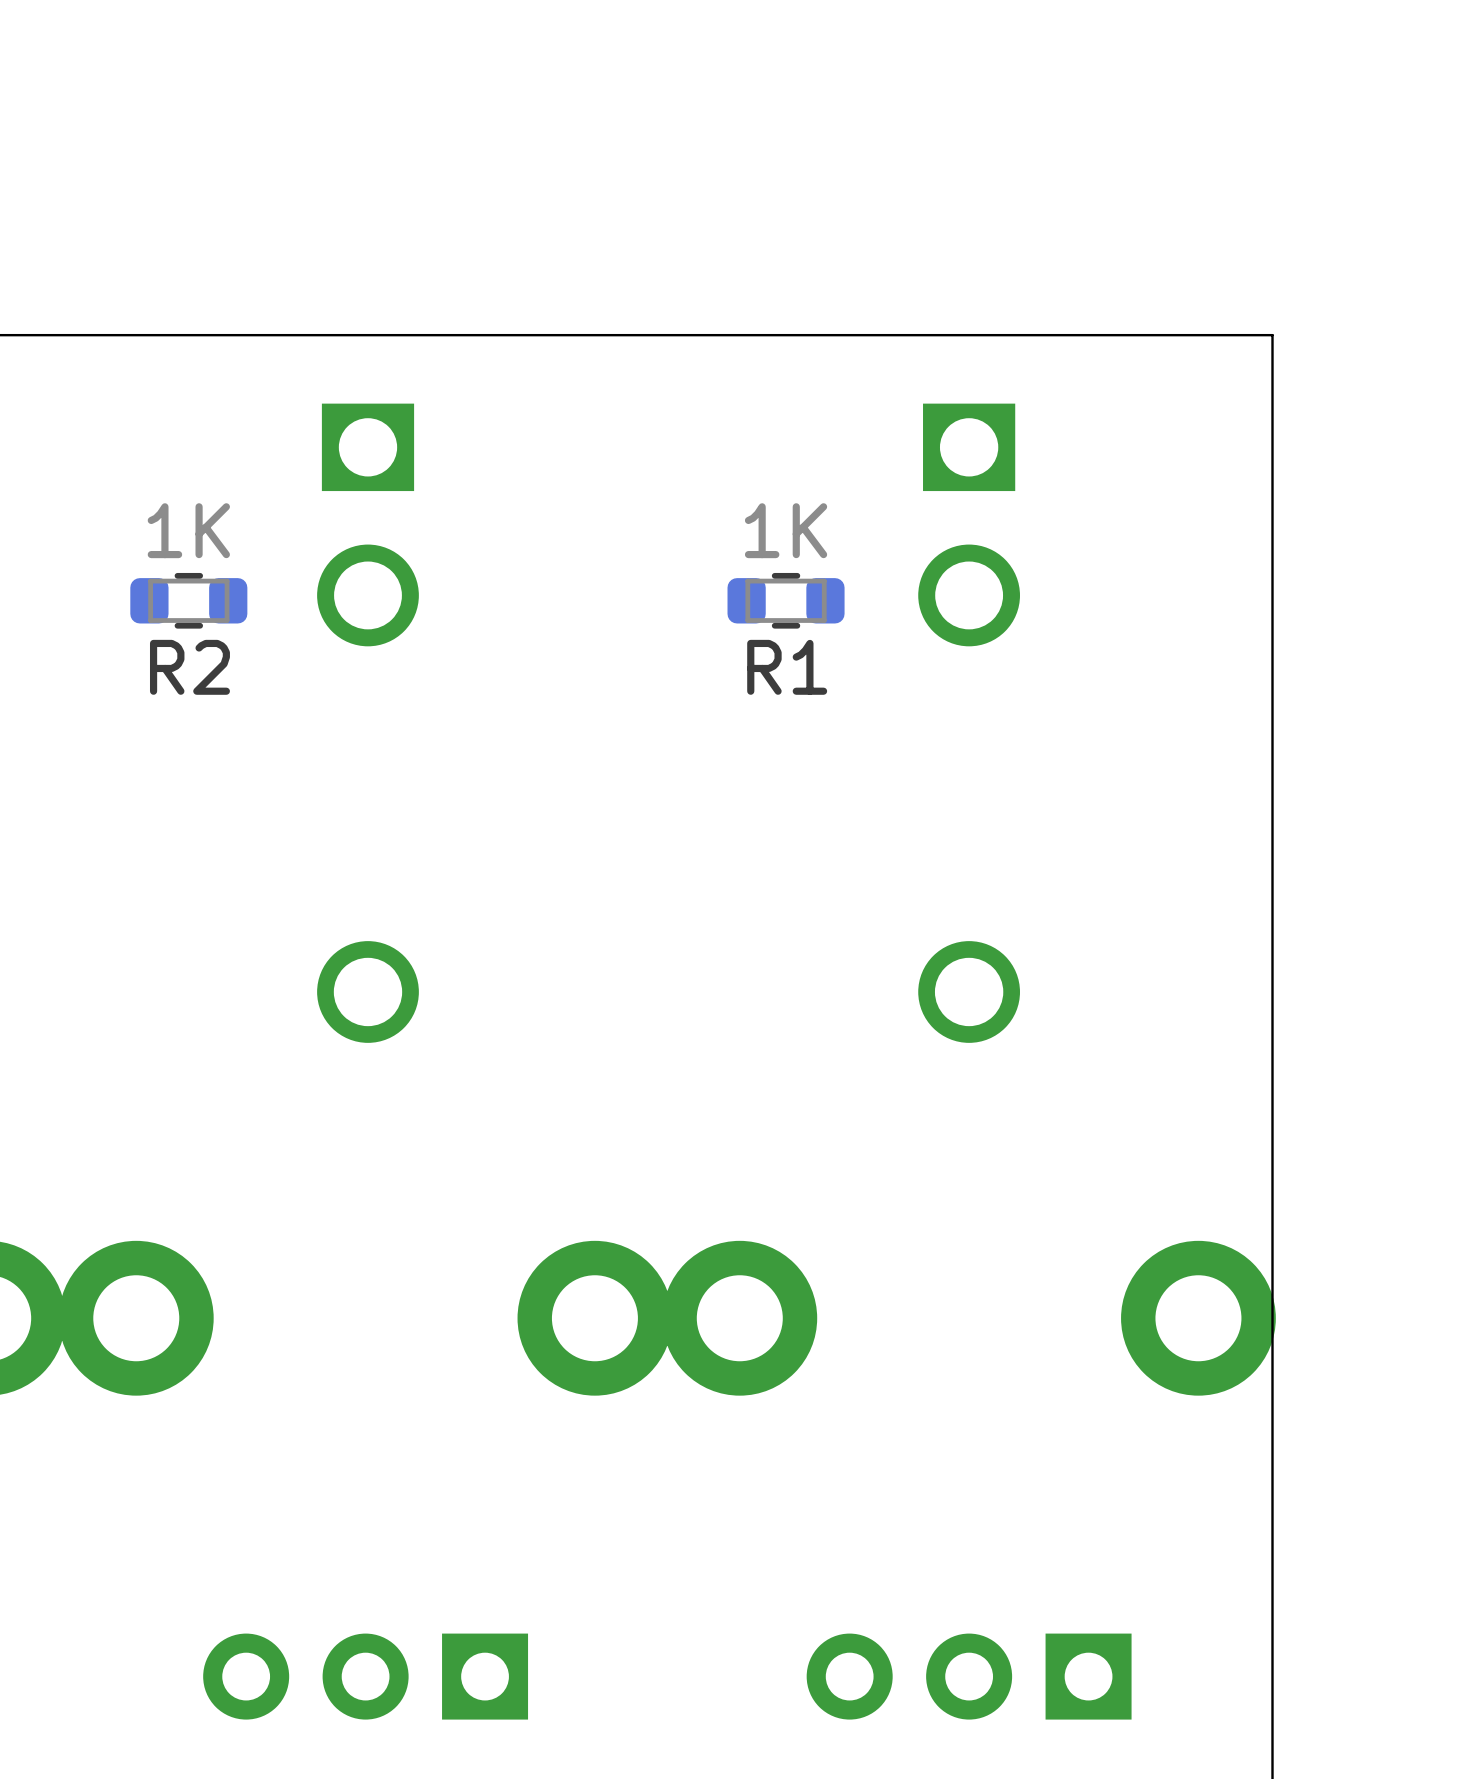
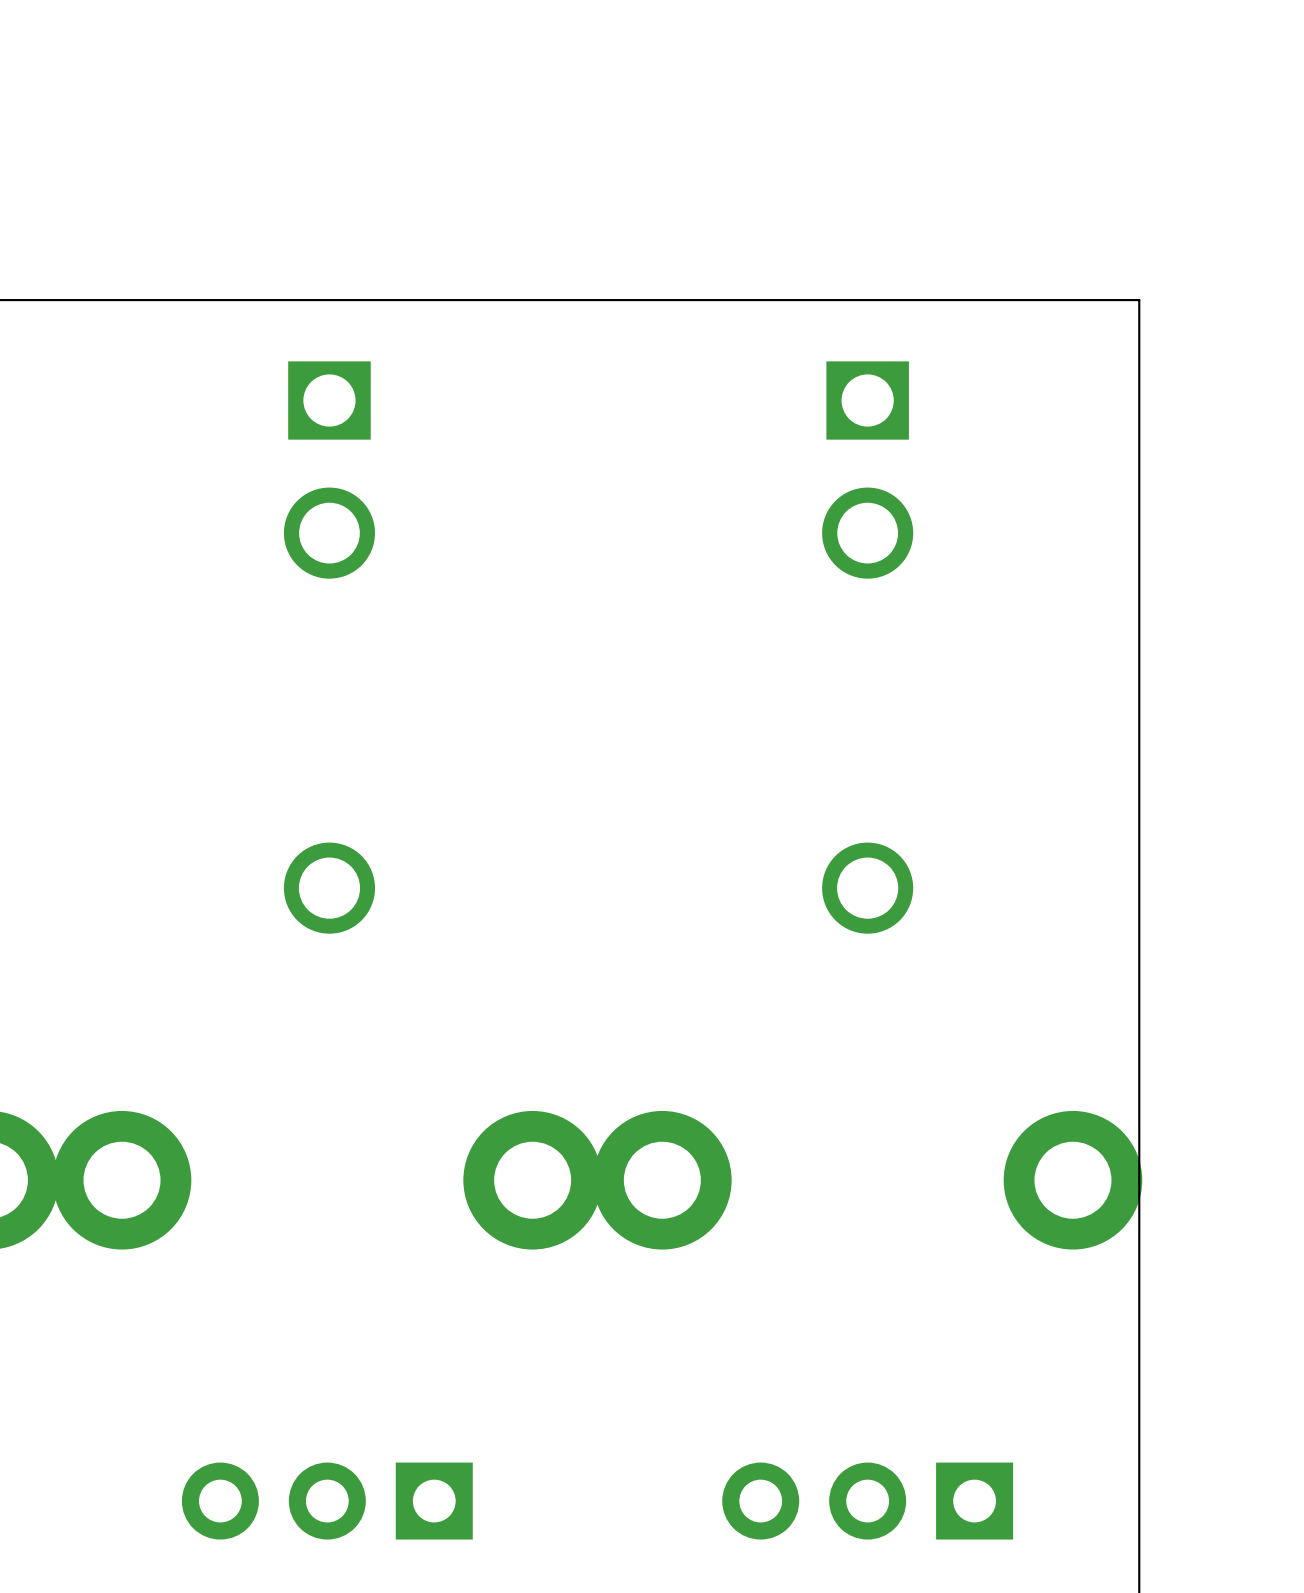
R2: 1K (188, 600) -> none
R1: 1K (786, 600) -> none

